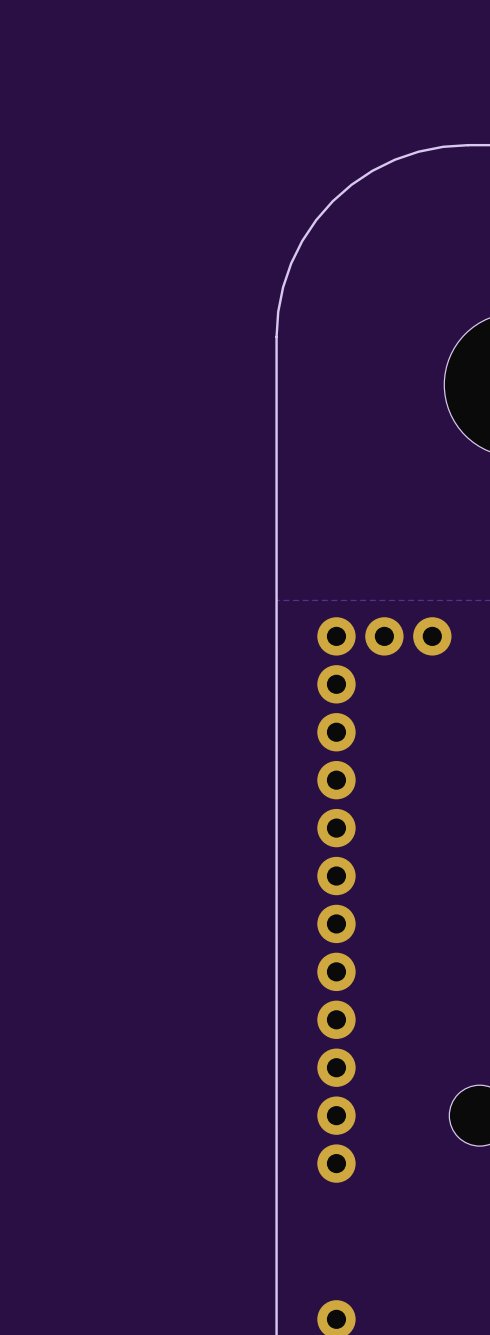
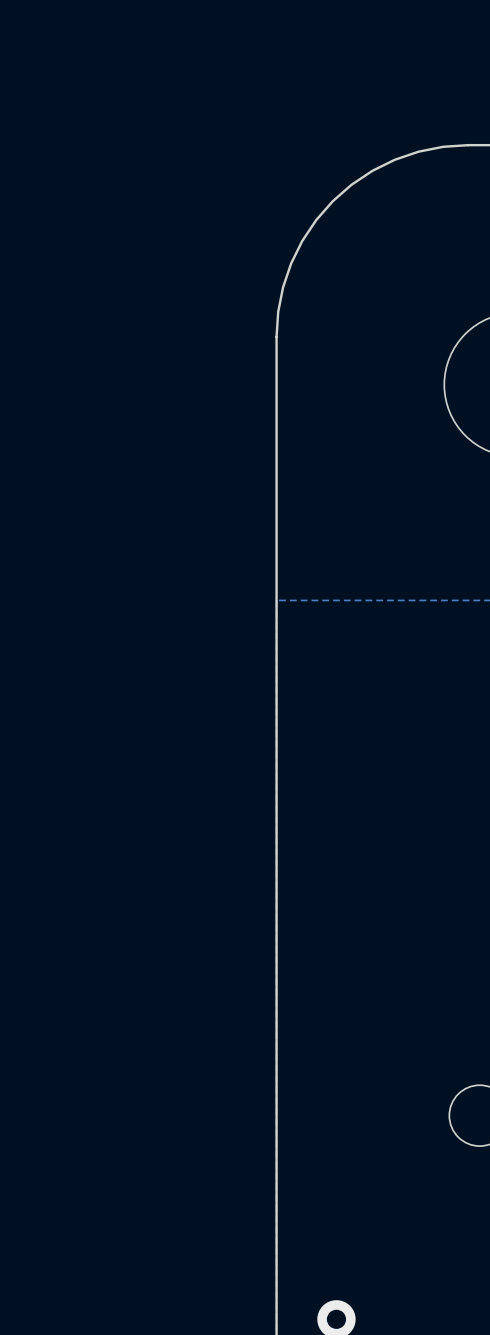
via: (336, 636) -> none
via: (384, 636) -> none
via: (432, 636) -> none
via: (336, 684) -> none
via: (336, 732) -> none
via: (336, 780) -> none
via: (336, 828) -> none
via: (336, 876) -> none
via: (336, 923) -> none
via: (336, 971) -> none
via: (336, 1019) -> none
via: (336, 1067) -> none
via: (336, 1115) -> none
via: (336, 1163) -> none

